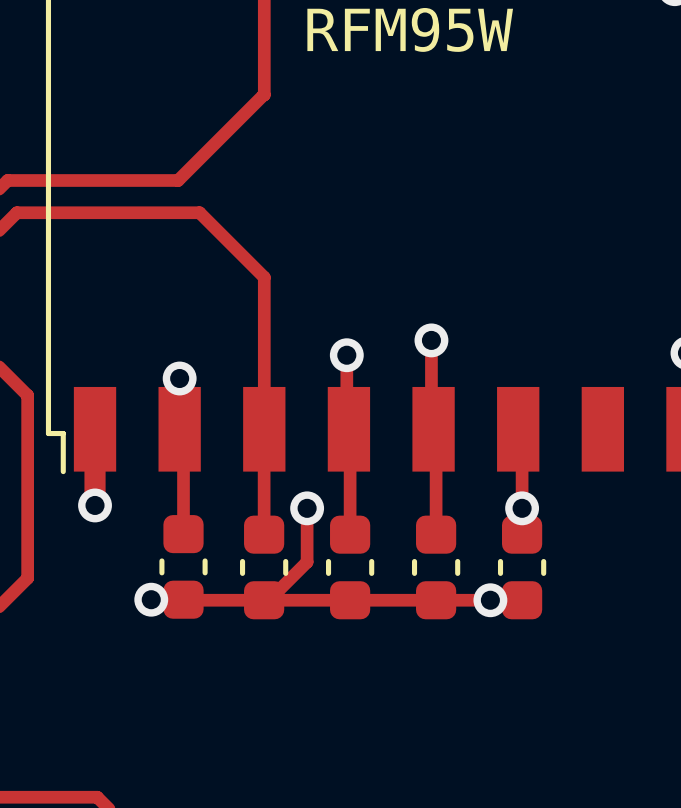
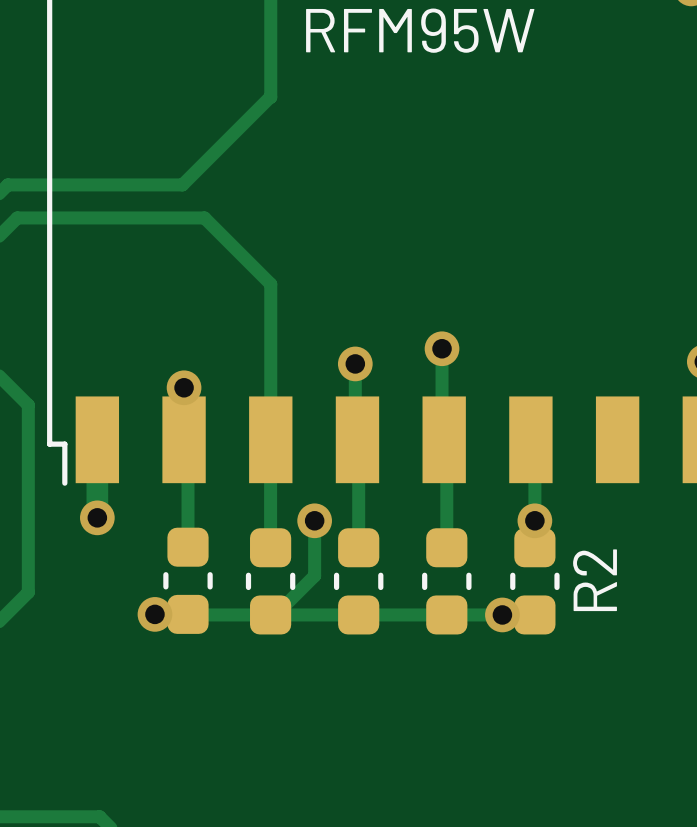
R2 name: none -> R2 (595, 580)

